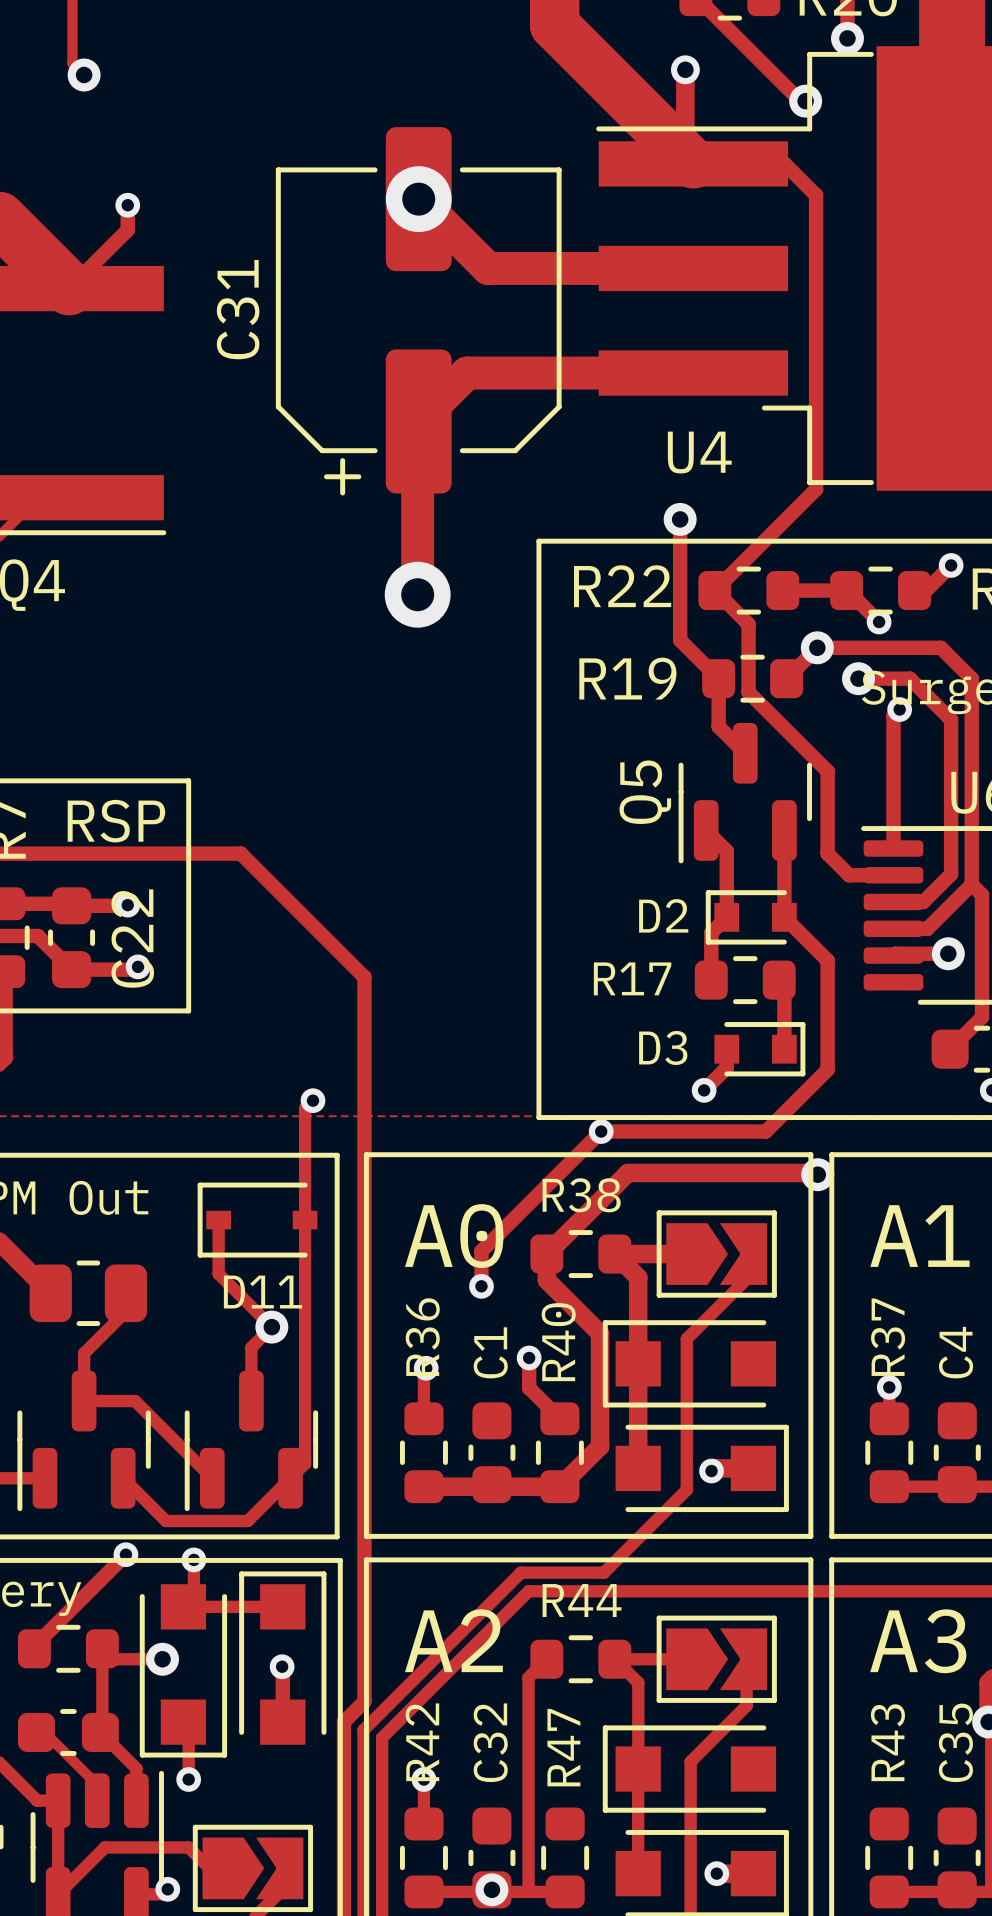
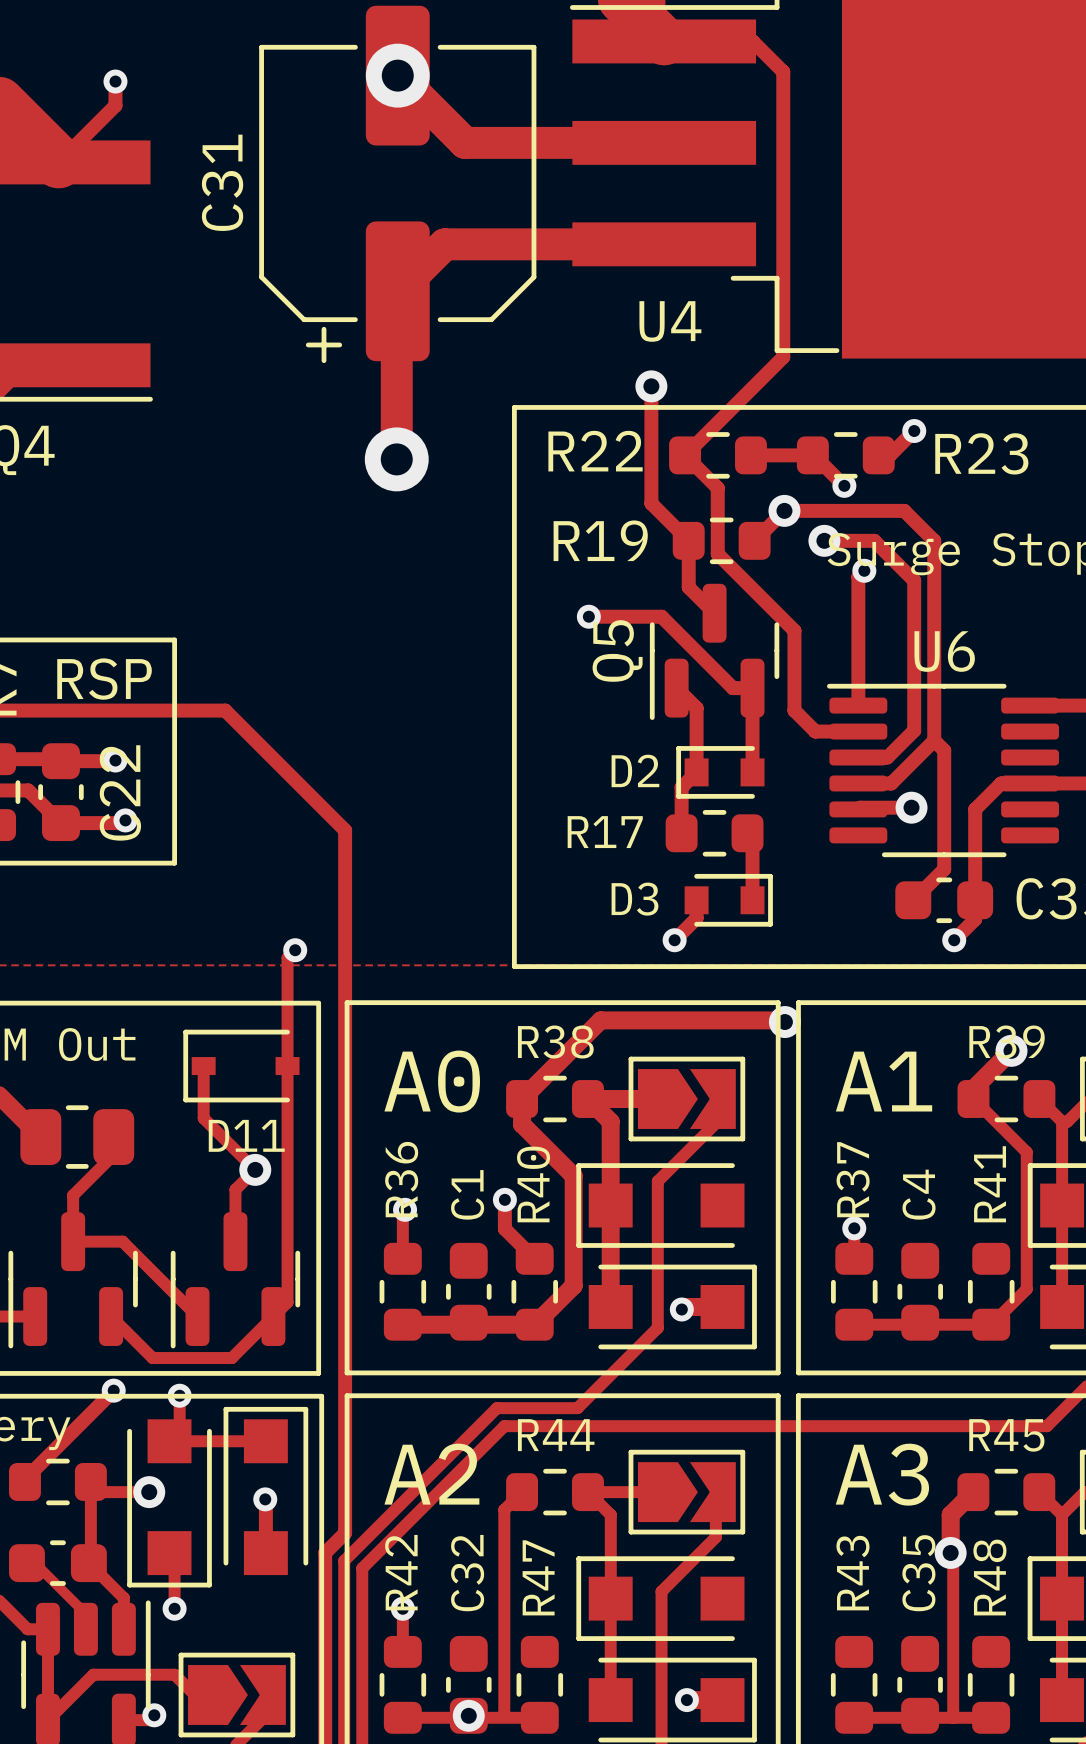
track: none -> (588, 616) (661, 616) (733, 688) (752, 688)
via: none -> (588, 616)
track: (784, 917) (827, 960) (827, 1069) (765, 1131) (601, 1131) (481, 1251) (481, 1286) -> none
via: (601, 1131) -> none
via: (481, 1286) -> none

